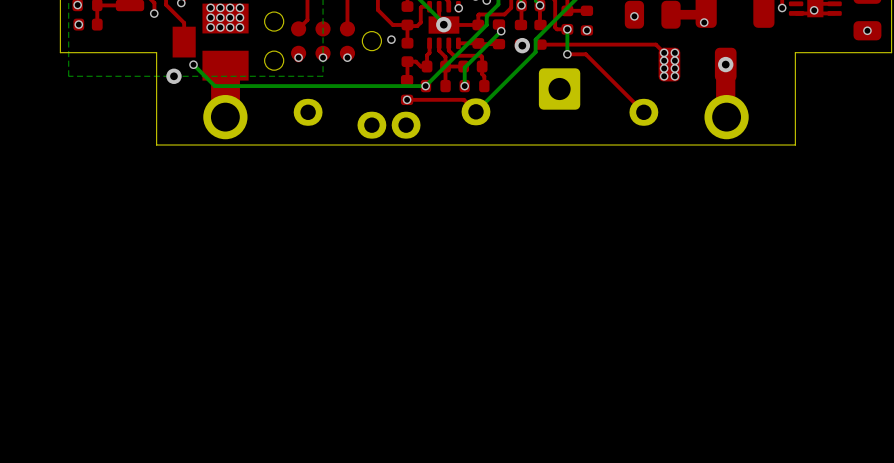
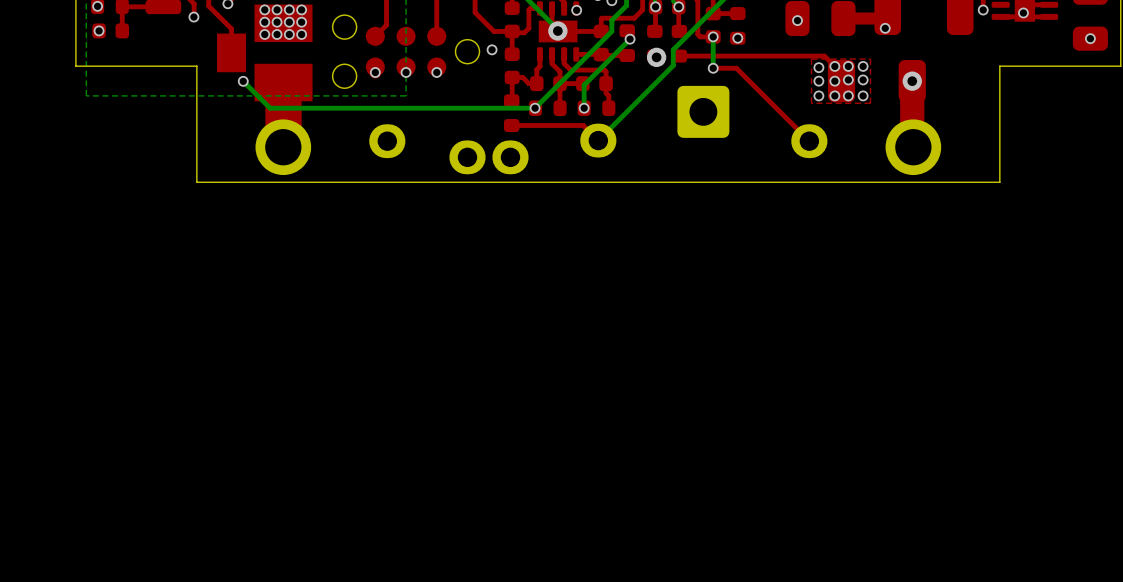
top zone outline: none -> (870, 59) (811, 59) (811, 103) (870, 103) (870, 59)
via: none -> (863, 66)
via: none -> (818, 67)
via: (664, 60) -> none
via: (674, 60) -> none
via: none -> (848, 79)
via: none -> (863, 79)
via: none -> (818, 81)
via: none -> (834, 81)
via: (664, 68) -> none
via: (674, 68) -> none
via: (173, 76) -> none
via: none -> (818, 95)
via: none -> (863, 95)
via: (407, 99) -> none

